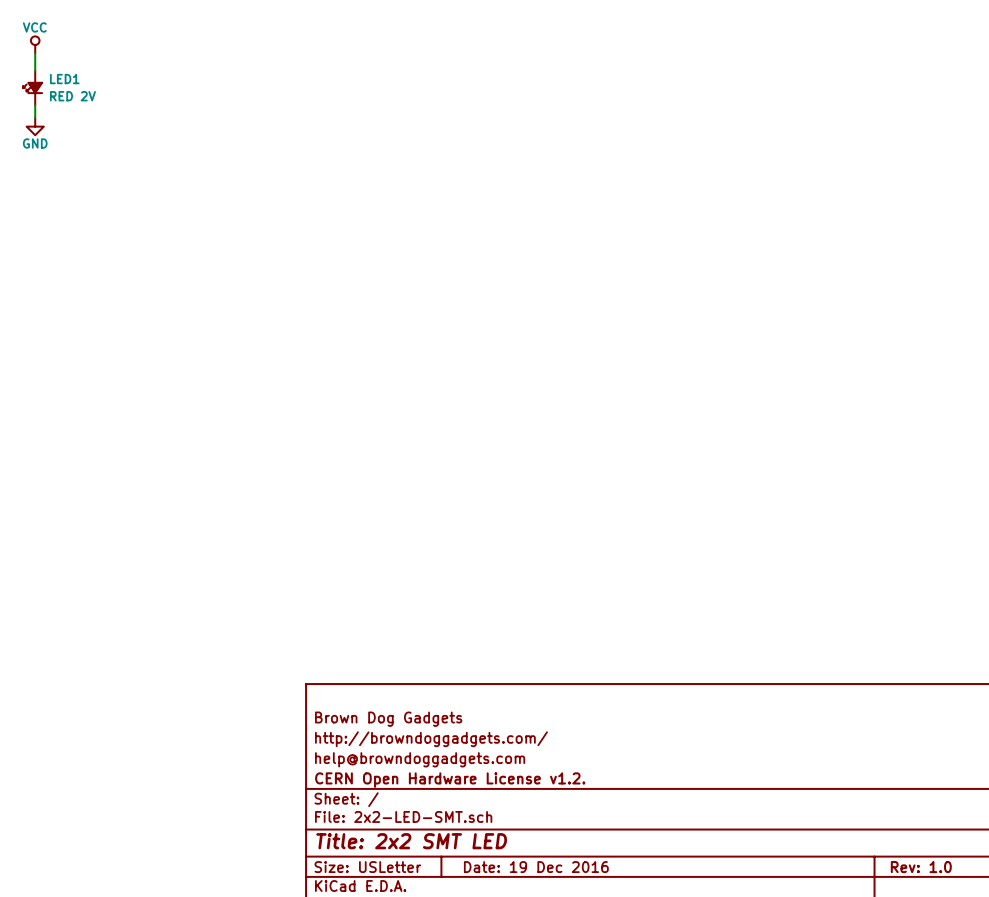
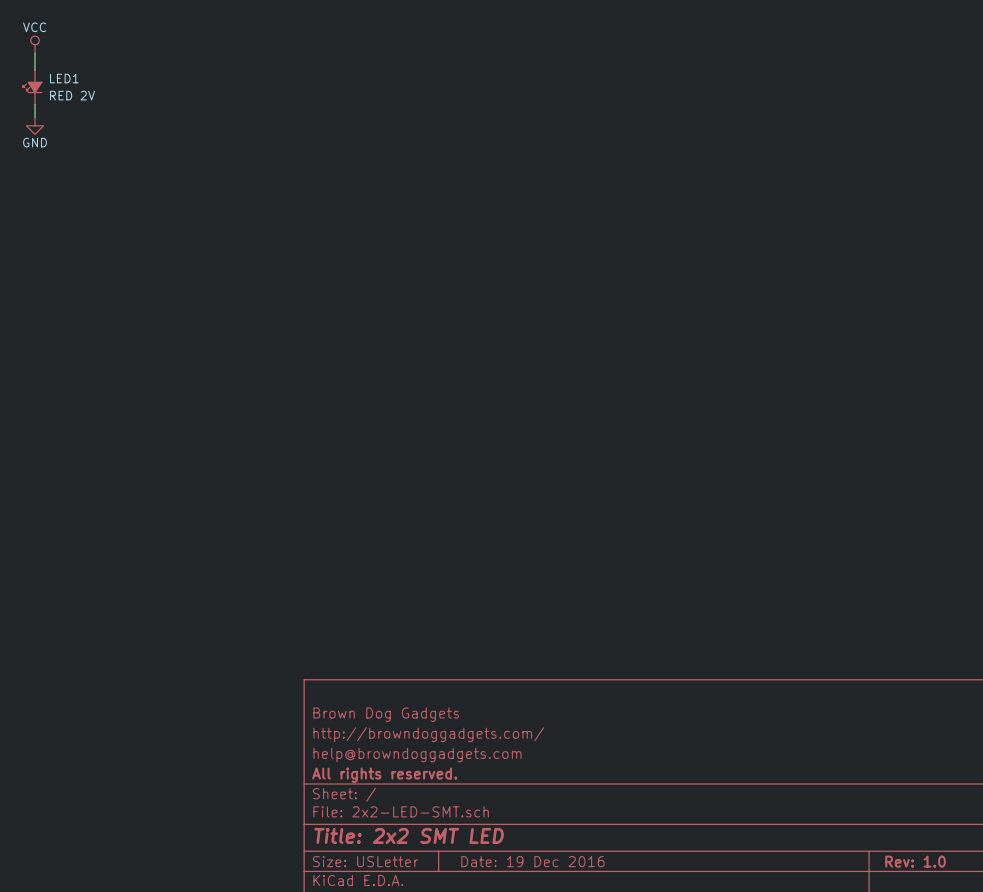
title block: CERN Open Hardware License v1.2. (450, 780) -> All rights reserved. (384, 775)

